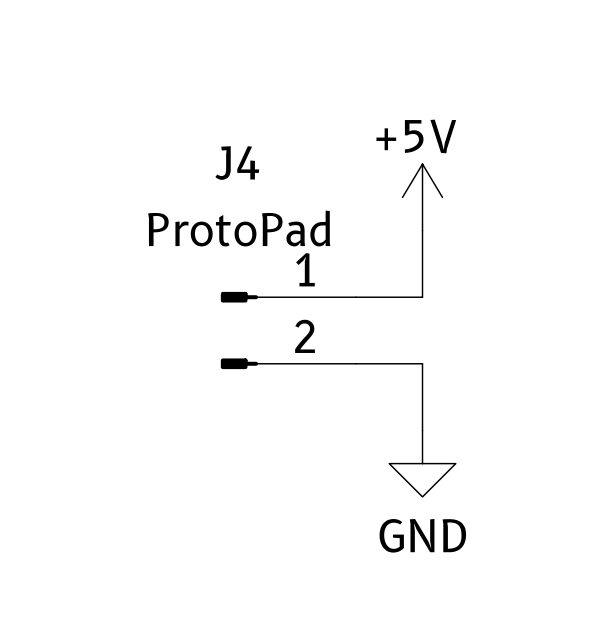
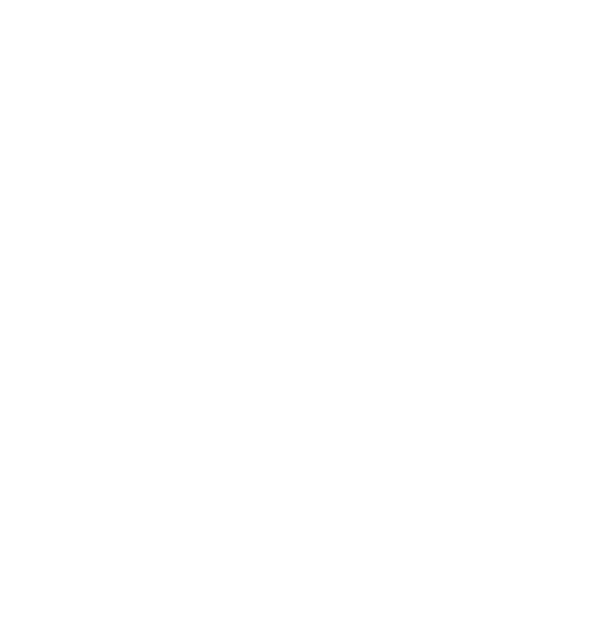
power symbol: +5V (422, 197) -> none
wire: (422, 230) (422, 297) (355, 297) -> none
J4: ProtoPad (288, 330) -> none
wire: (355, 363) (422, 363) (422, 430) -> none
power symbol: GND (422, 463) -> none

